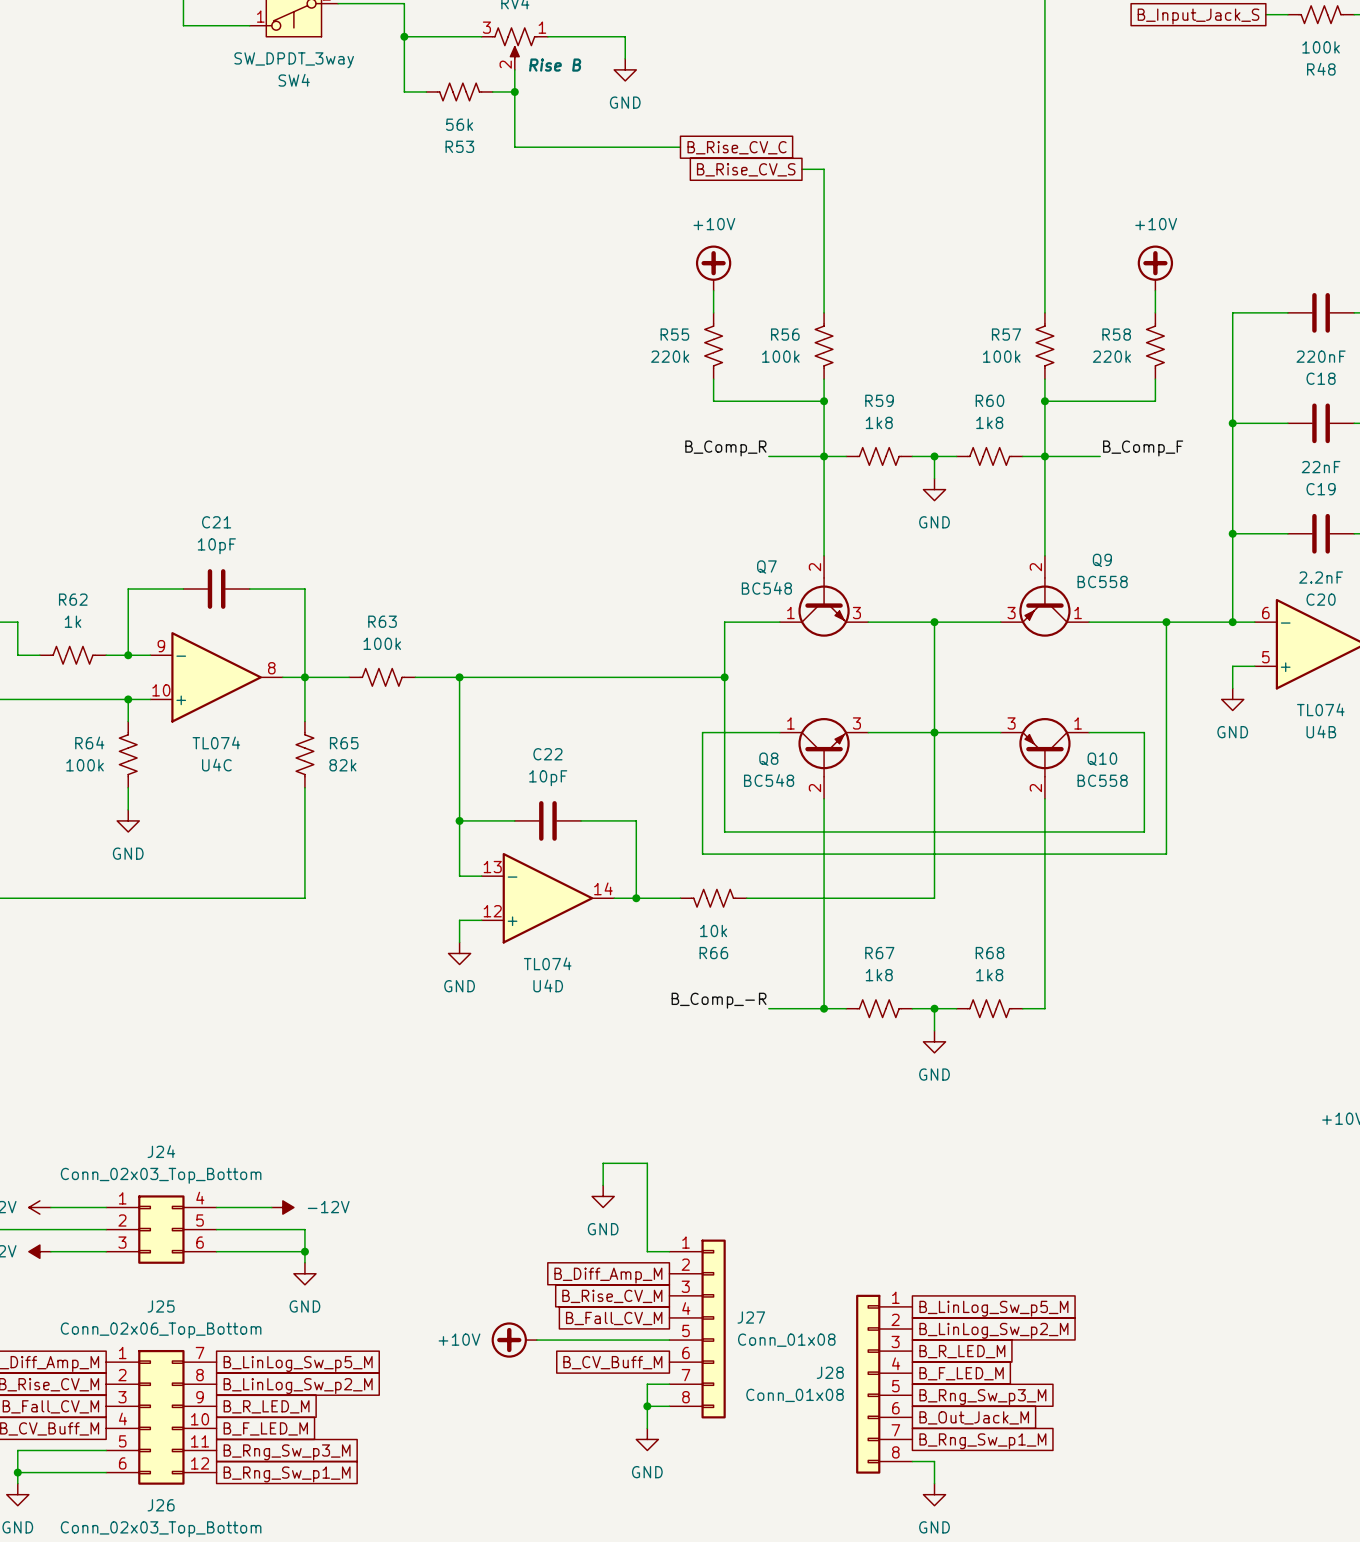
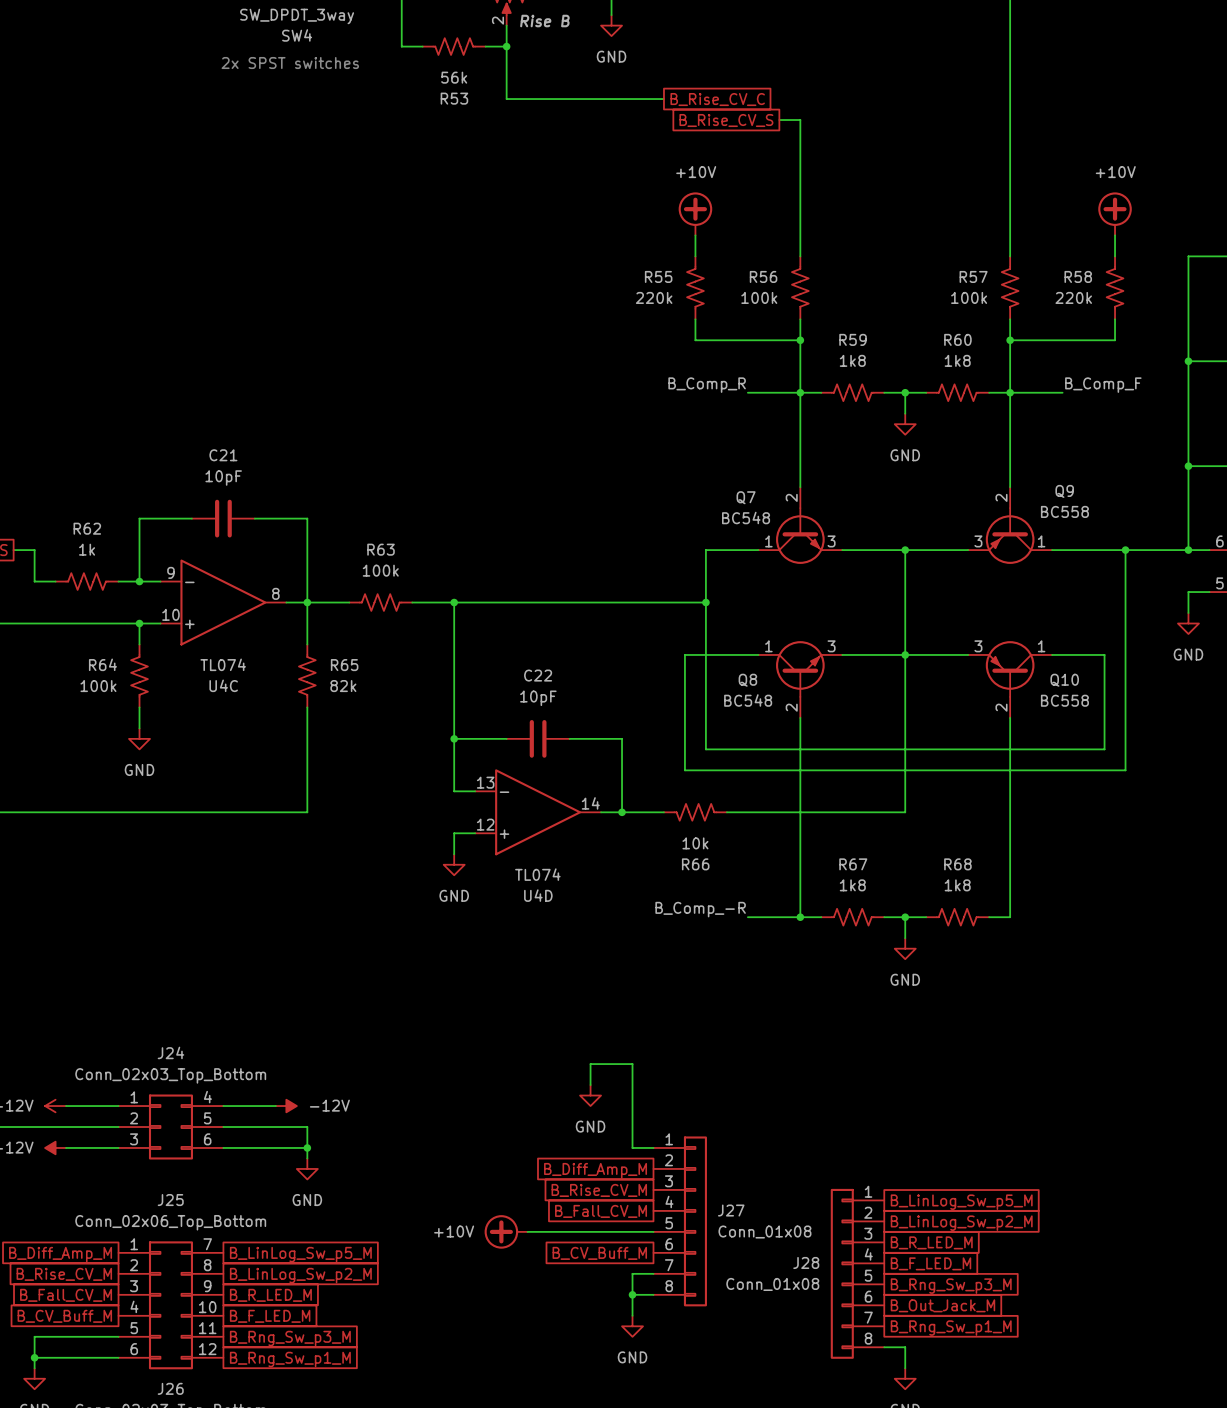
text: none -> 2x SPST switches (290, 63)

